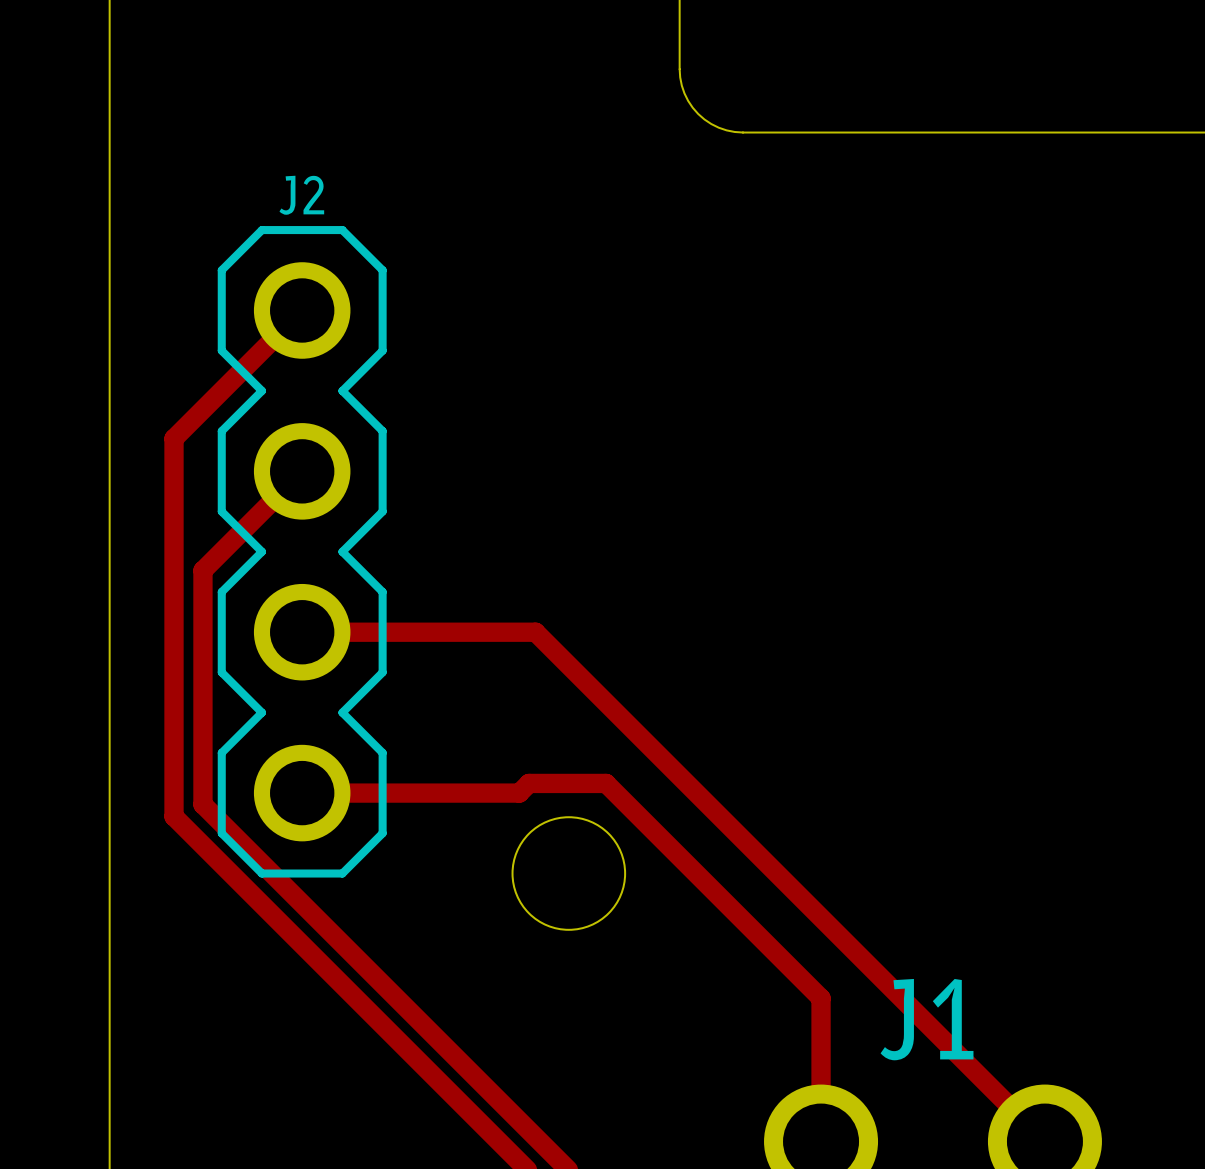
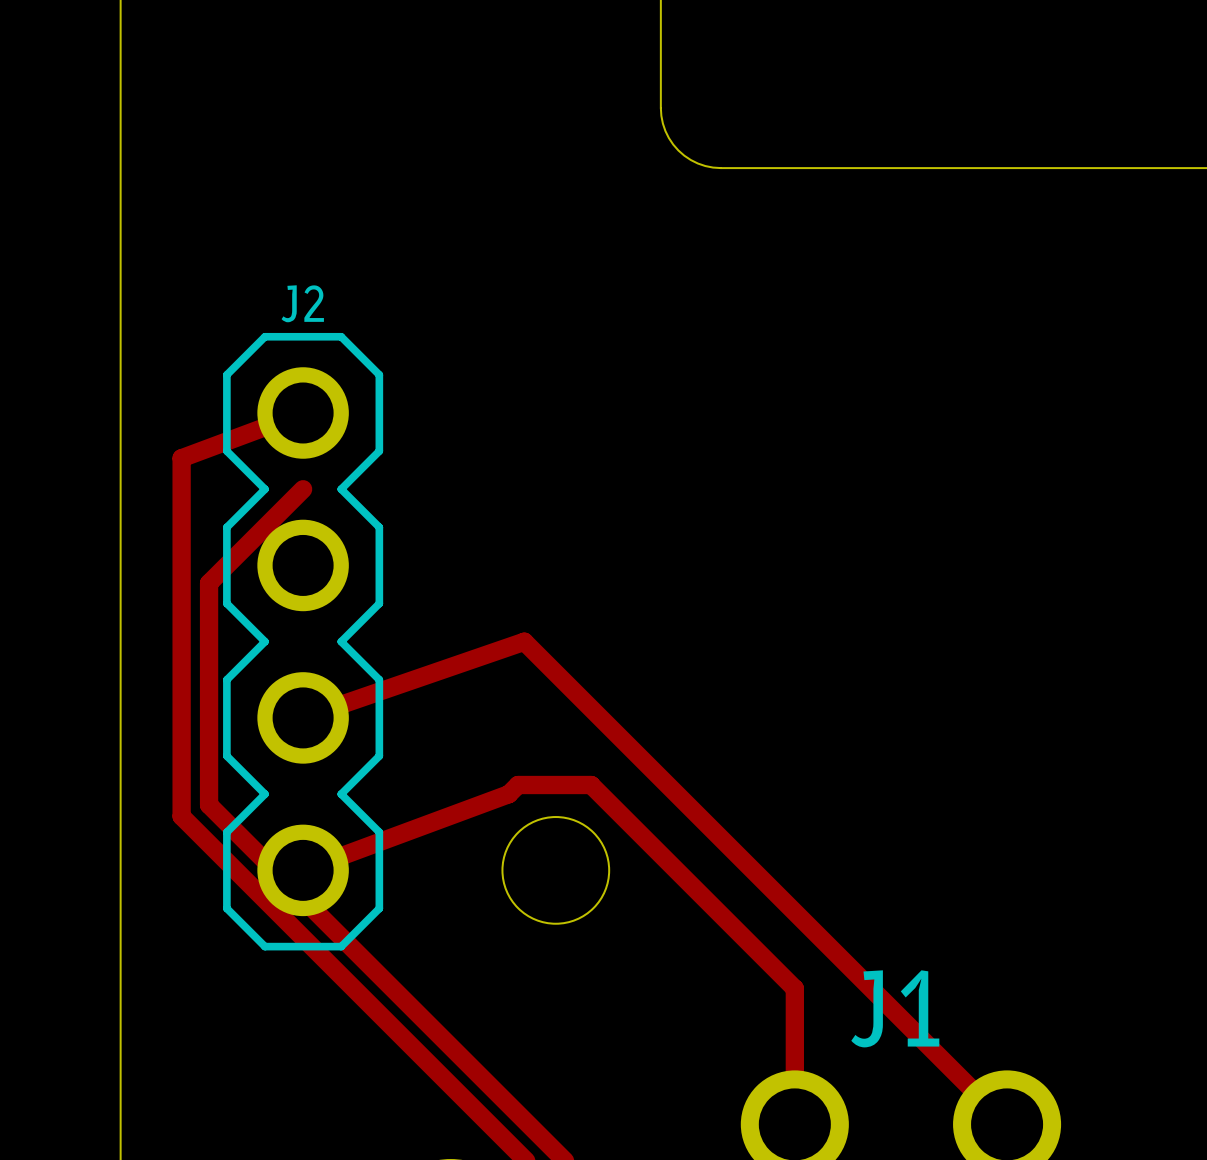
top track: (302, 310) (174, 438) -> (303, 412) (181, 458)
J2 position: (302, 551) -> (303, 641)
top track: (302, 632) (535, 632) -> (303, 717) (524, 641)
top track: (302, 793) (519, 793) -> (303, 870) (508, 794)

